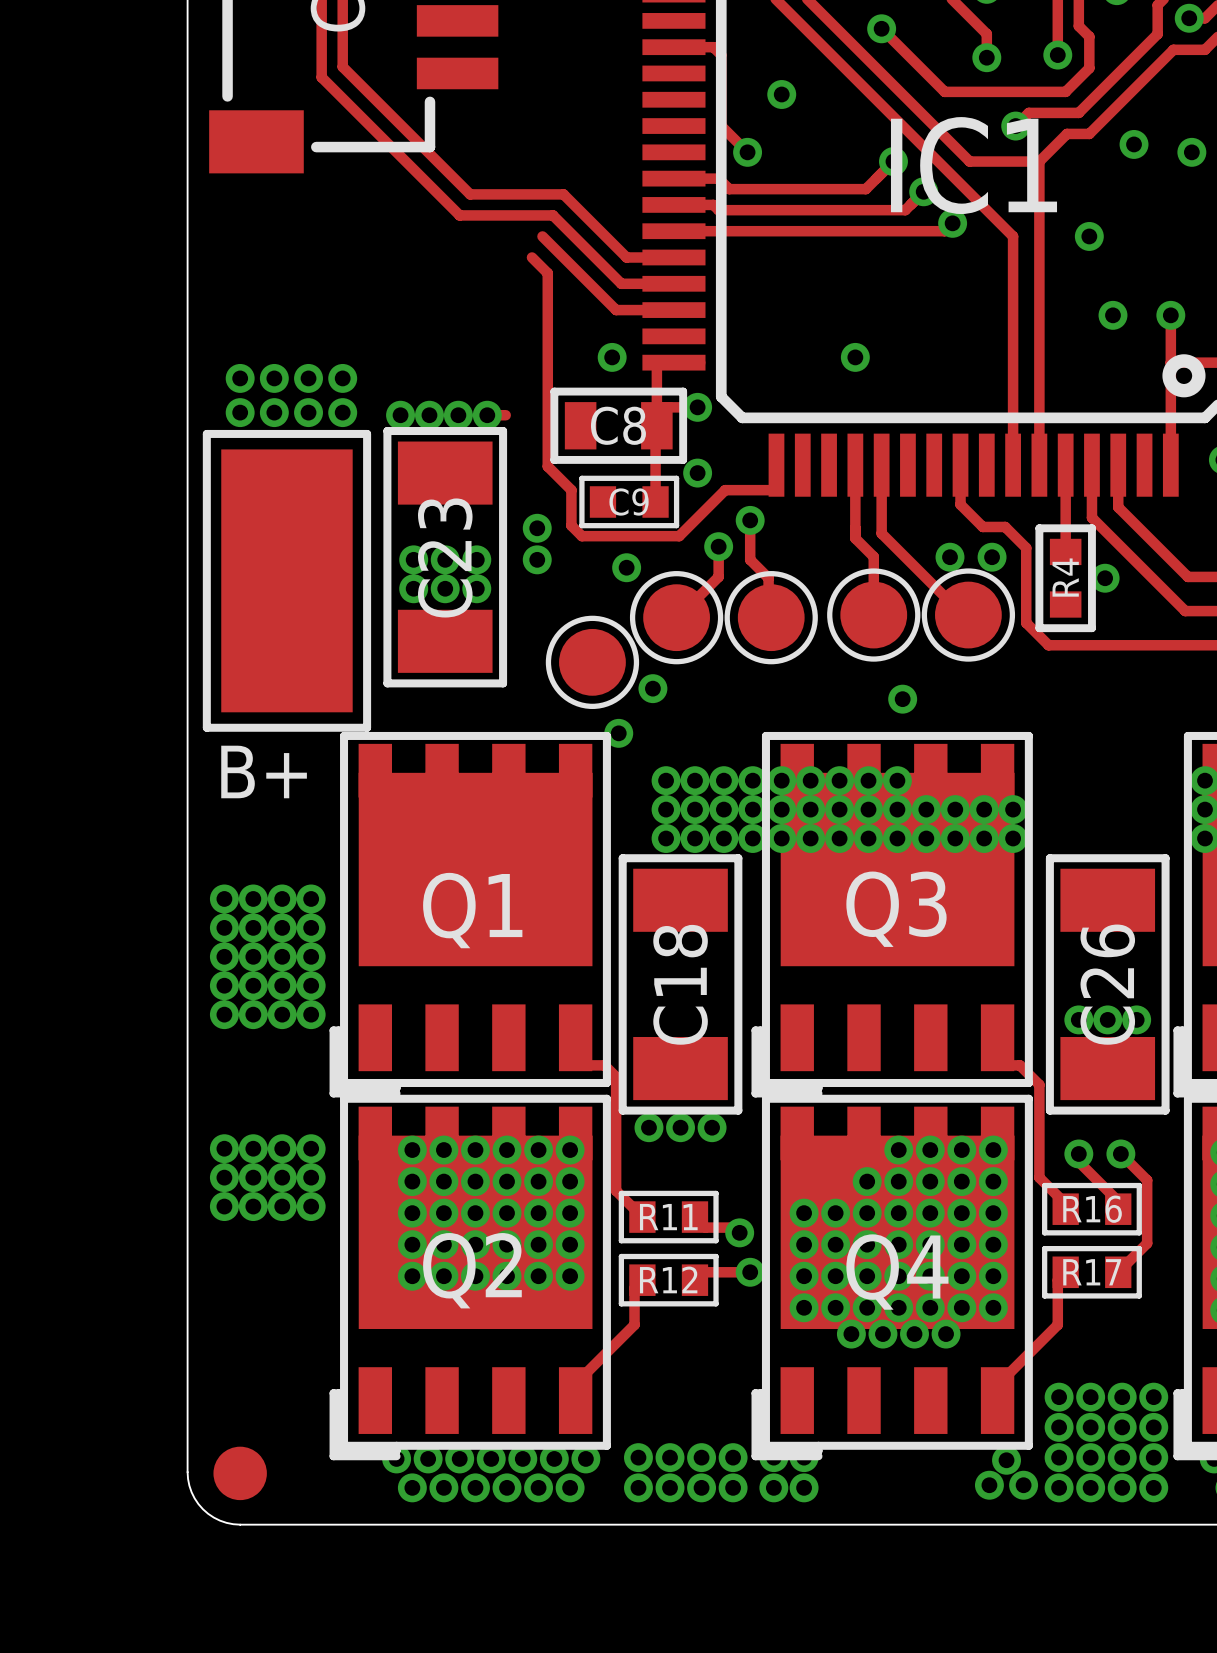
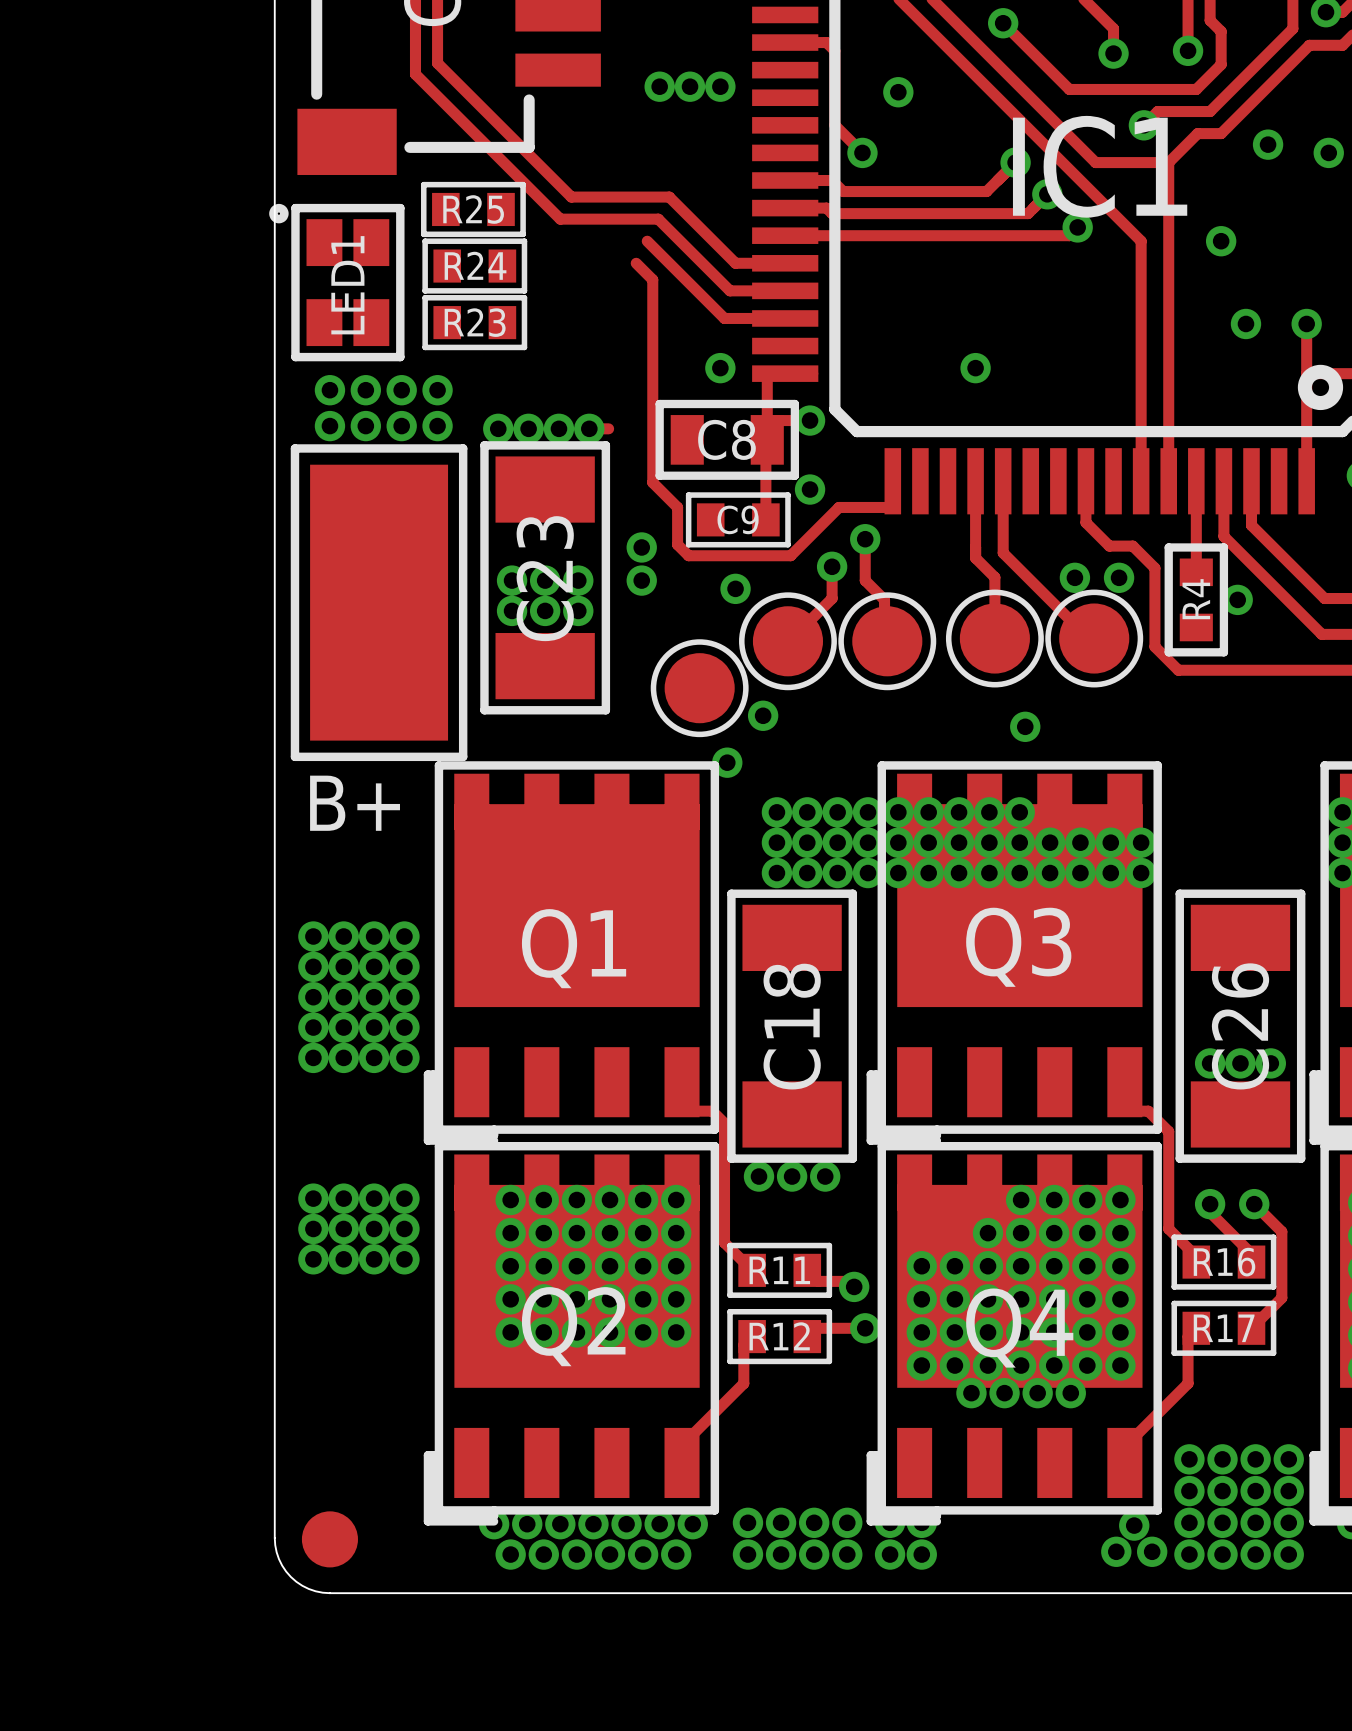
via: none -> (659, 86)
via: none -> (690, 86)
via: none -> (720, 86)
R25: none -> (473, 209)
R24: none -> (474, 266)
LED1: none -> (336, 282)
R23: none -> (474, 322)

